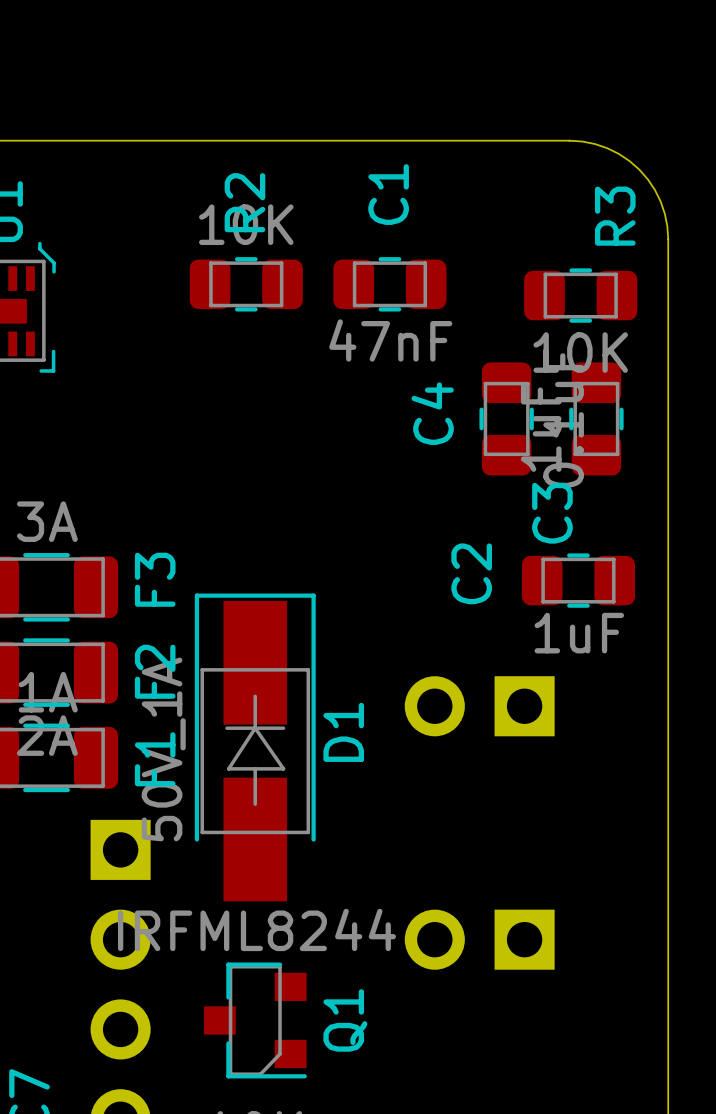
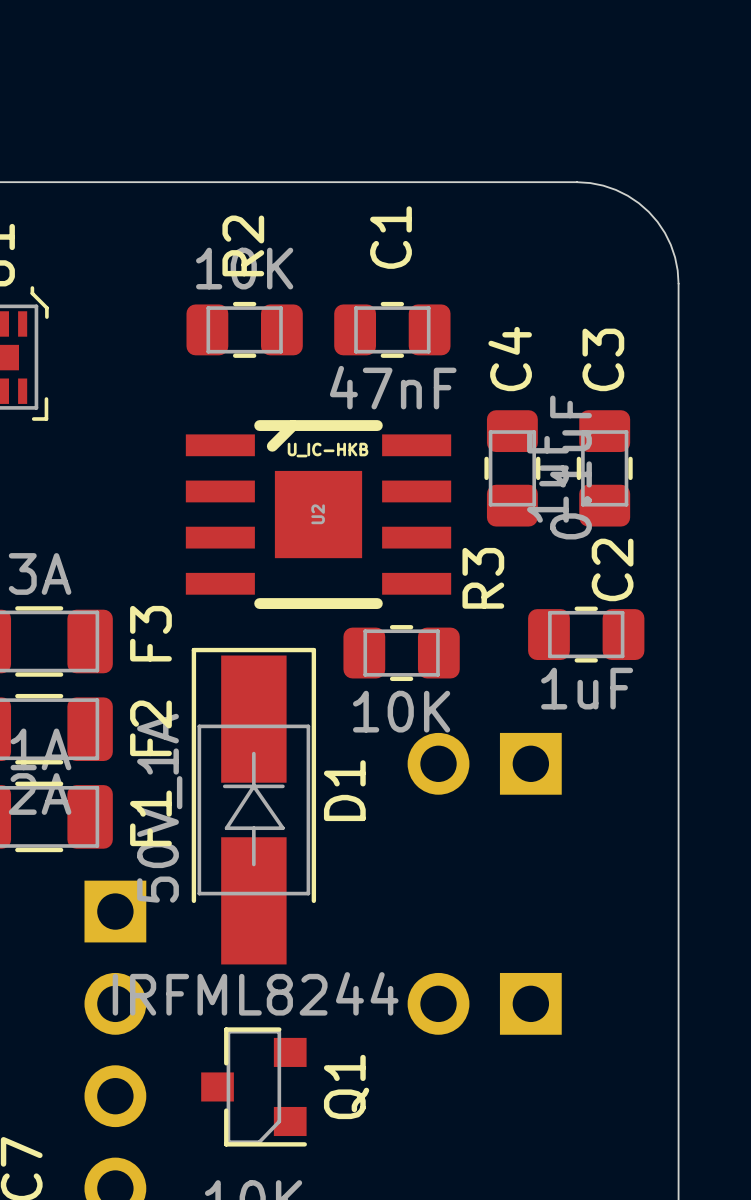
R3 name position: R3 (615, 216) -> R3 (483, 578)
R3 position: (580, 295) -> (401, 653)
C4 name position: C4 (432, 413) -> C4 (510, 359)
U2: none -> U_IC-HKB (318, 514)
C3 name position: C3 (552, 513) -> C3 (603, 359)
C2 name position: C2 (471, 573) -> C2 (612, 569)

